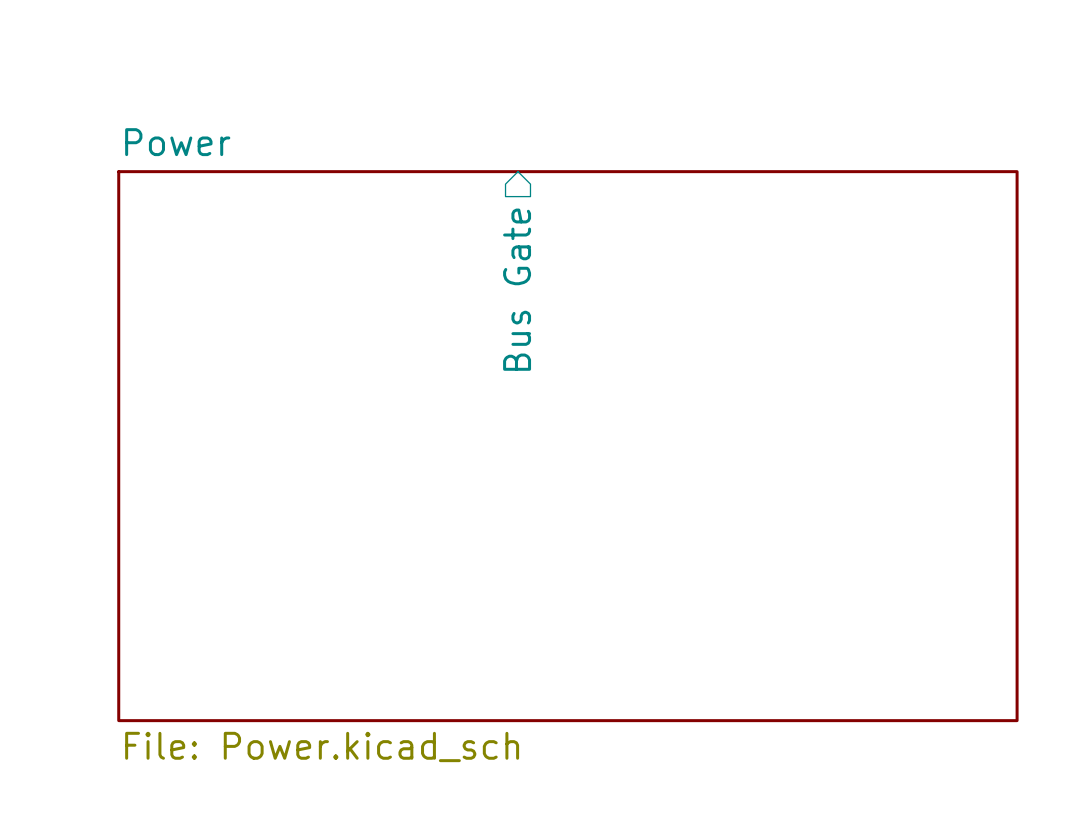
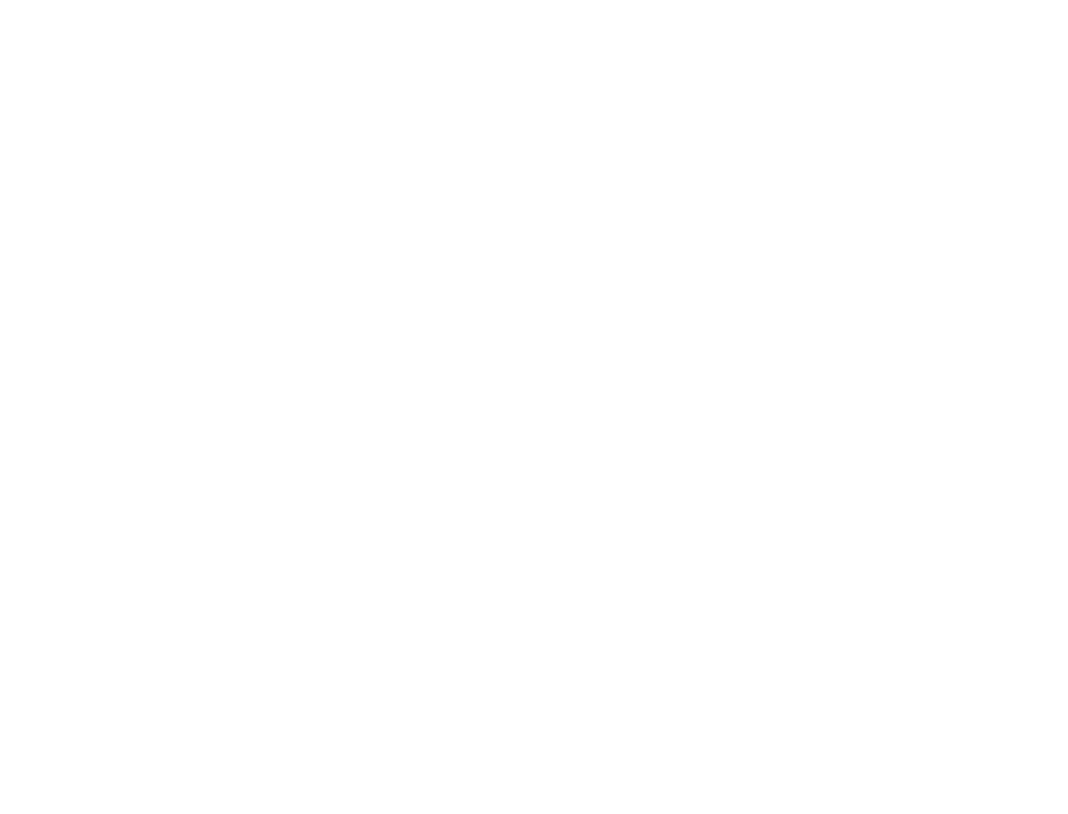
sheet pin: Bus Gate (517, 289) -> none
sheet Power: File: Power.kicad_sch (567, 446) -> none

